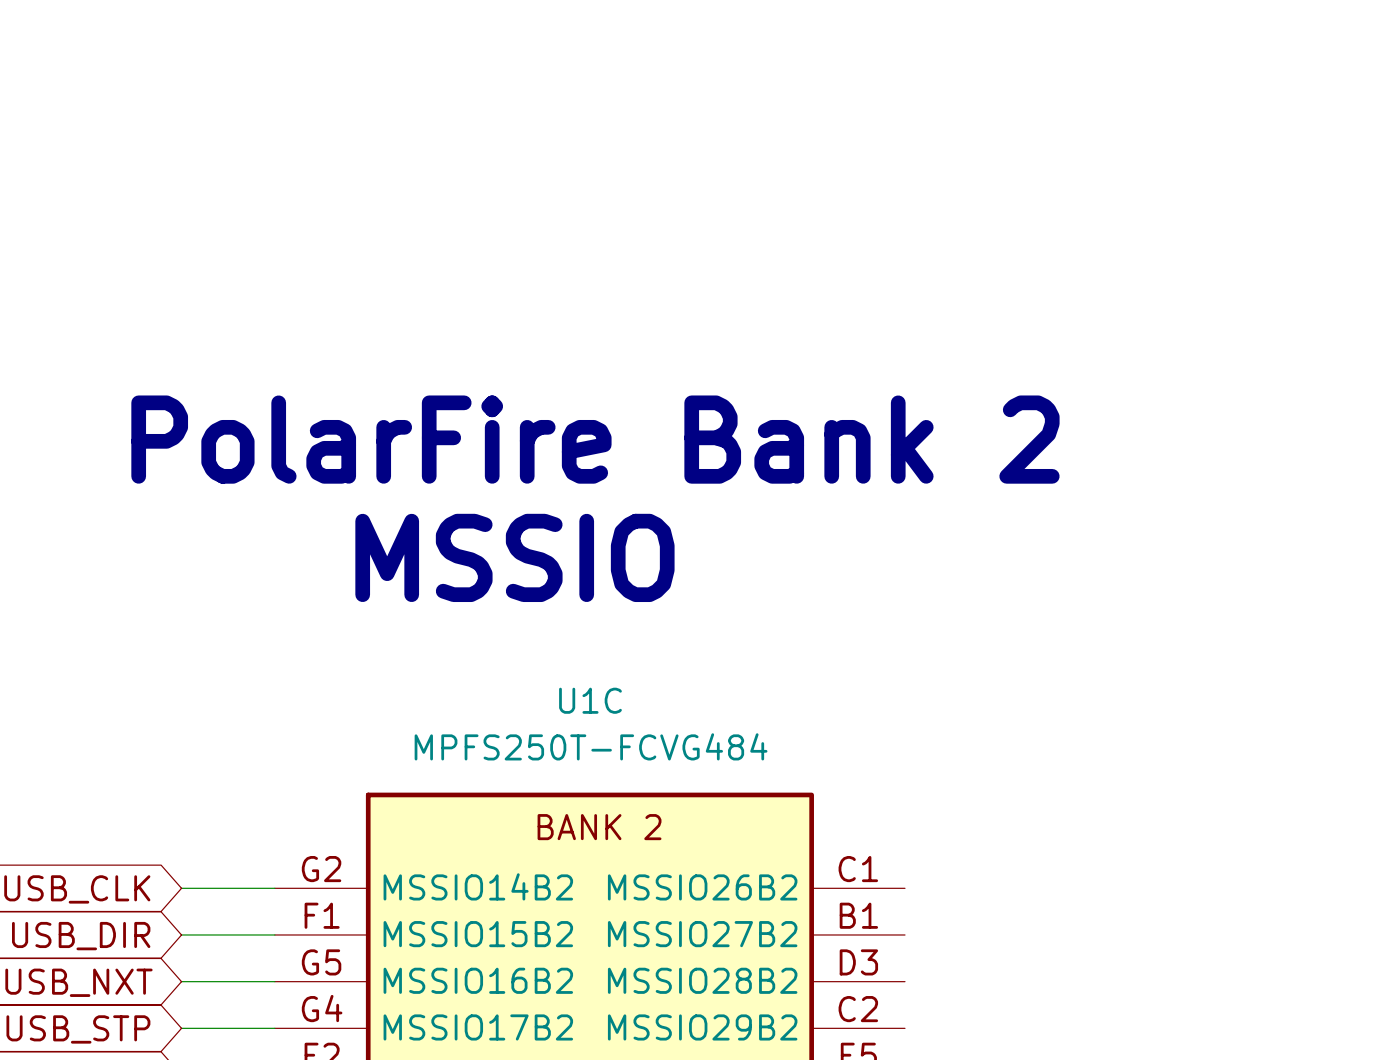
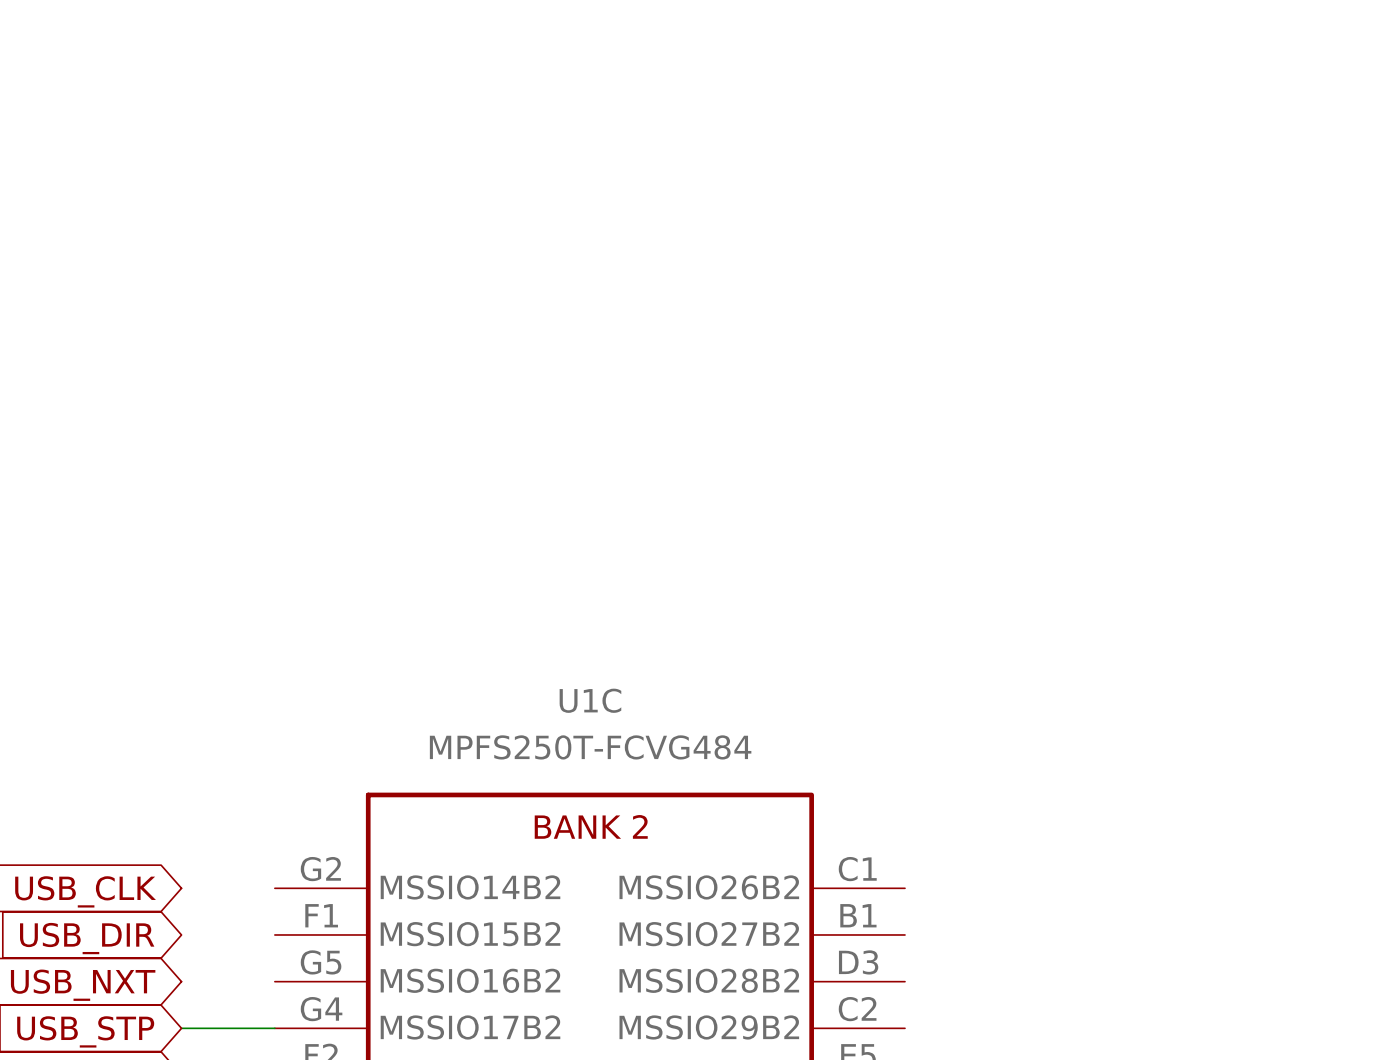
text: PolarFire Bank 2 (595, 439) -> none
text: MSSIO (514, 557) -> none
wire: (181, 888) (274, 888) -> none
wire: (181, 934) (274, 934) -> none
wire: (181, 981) (274, 981) -> none

